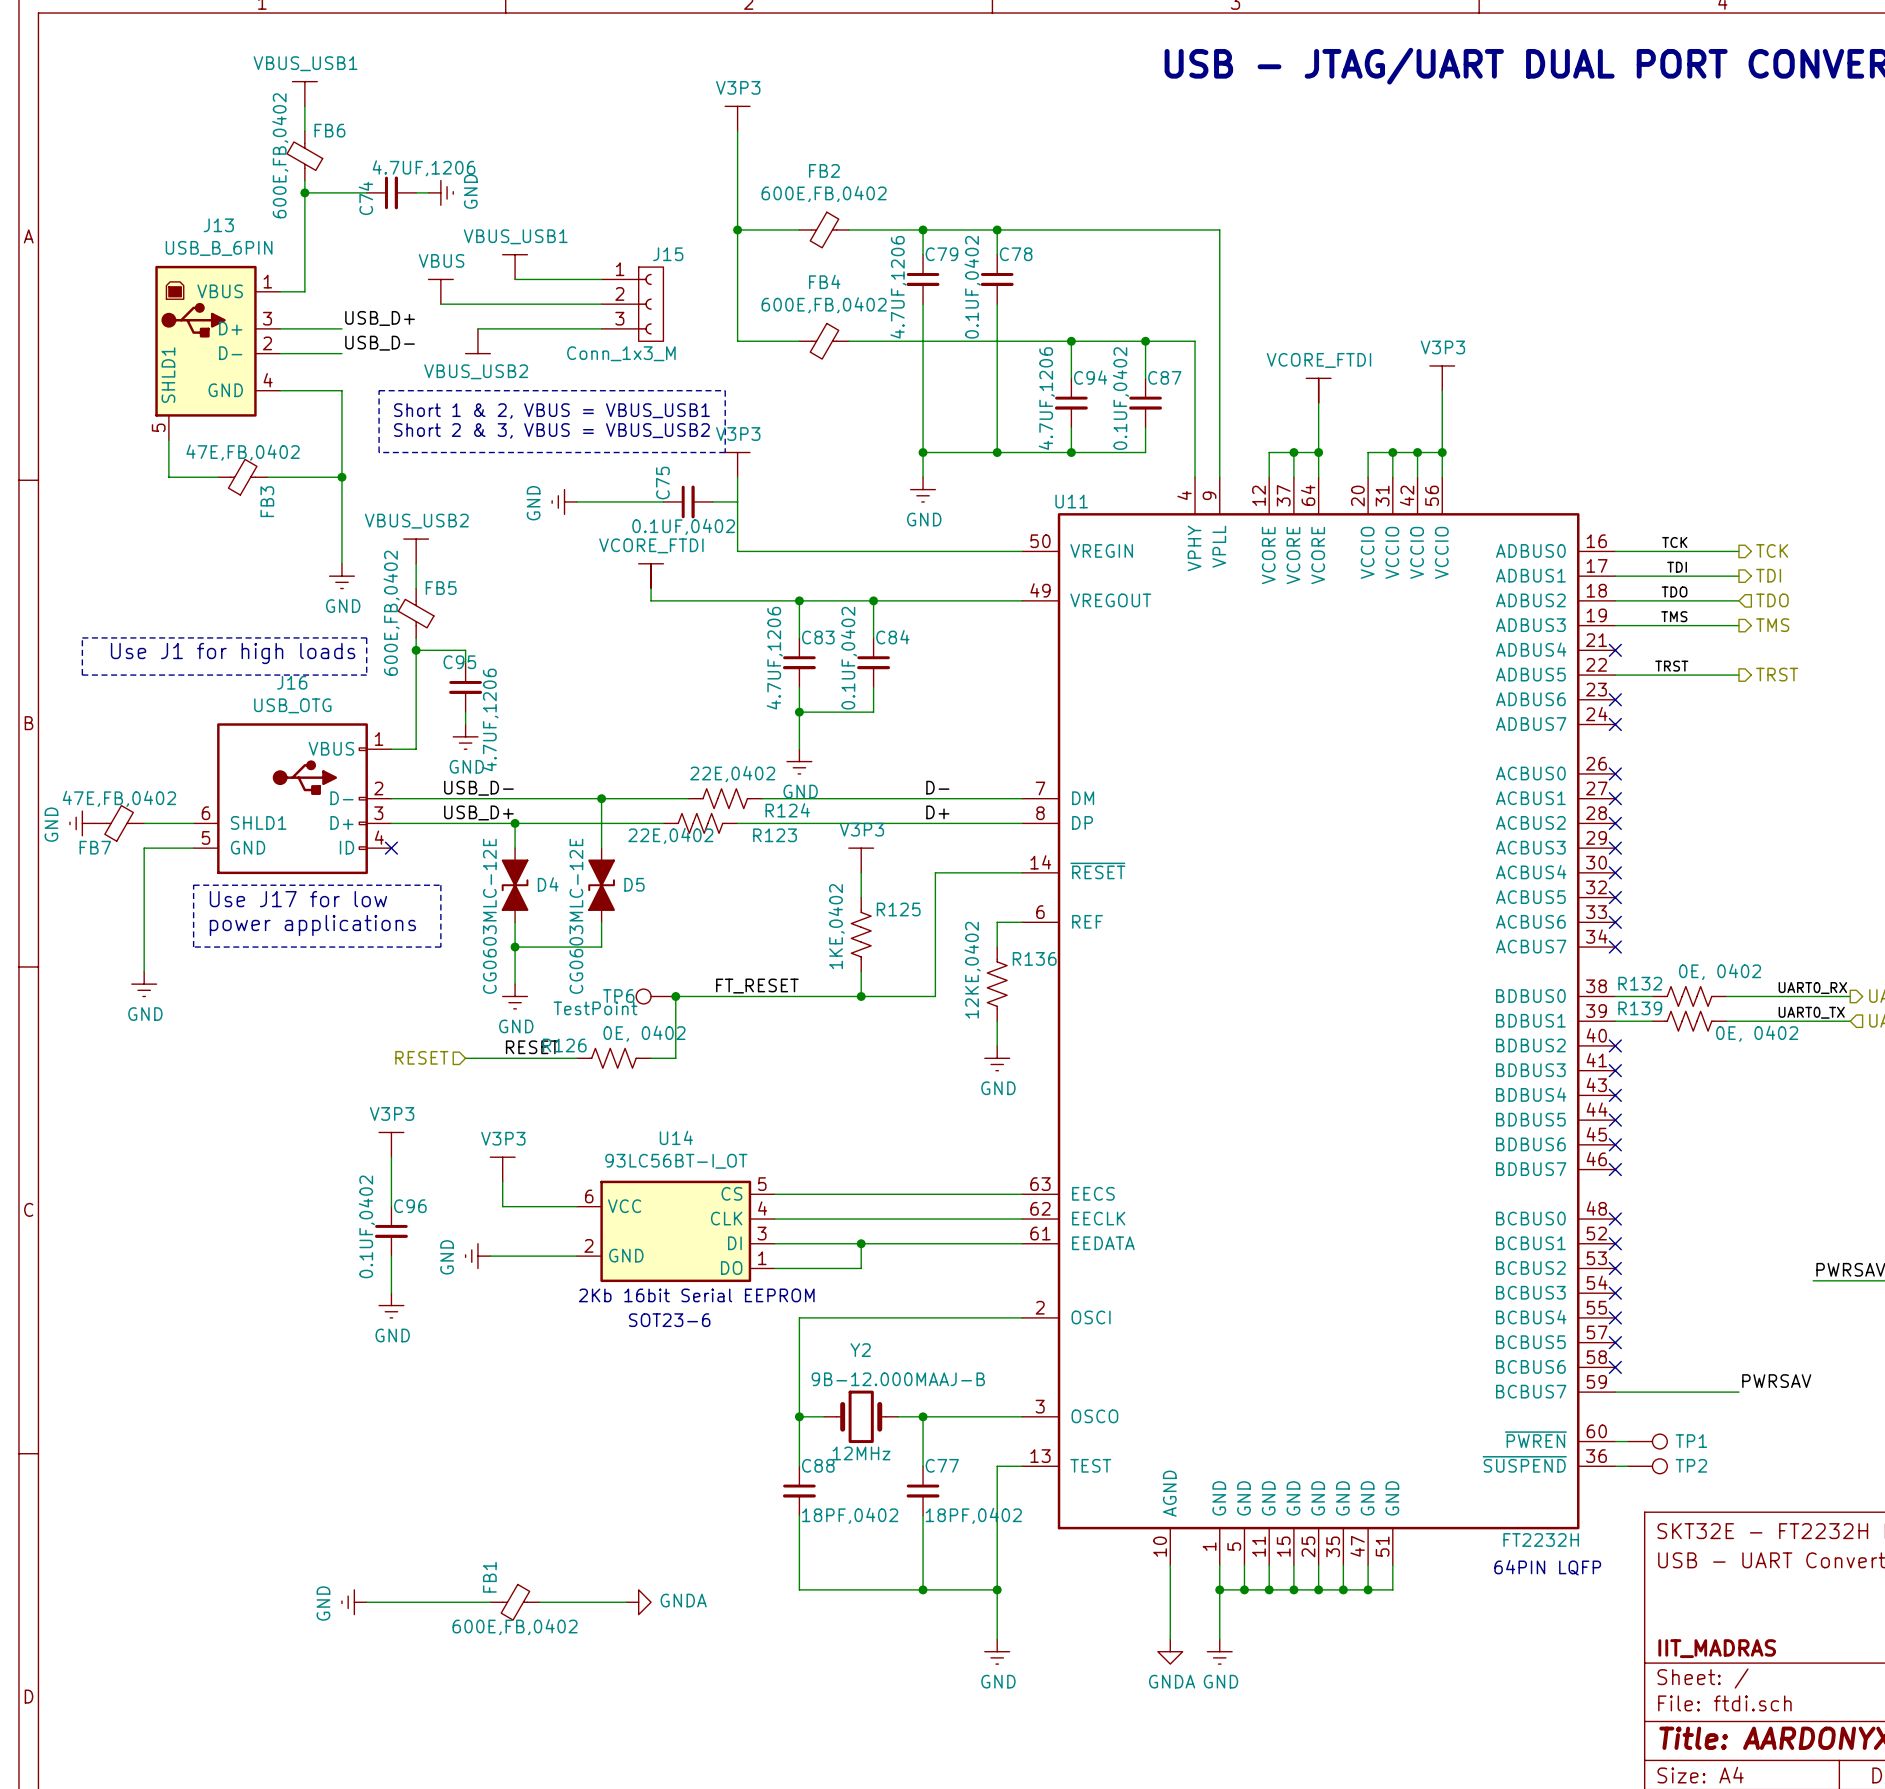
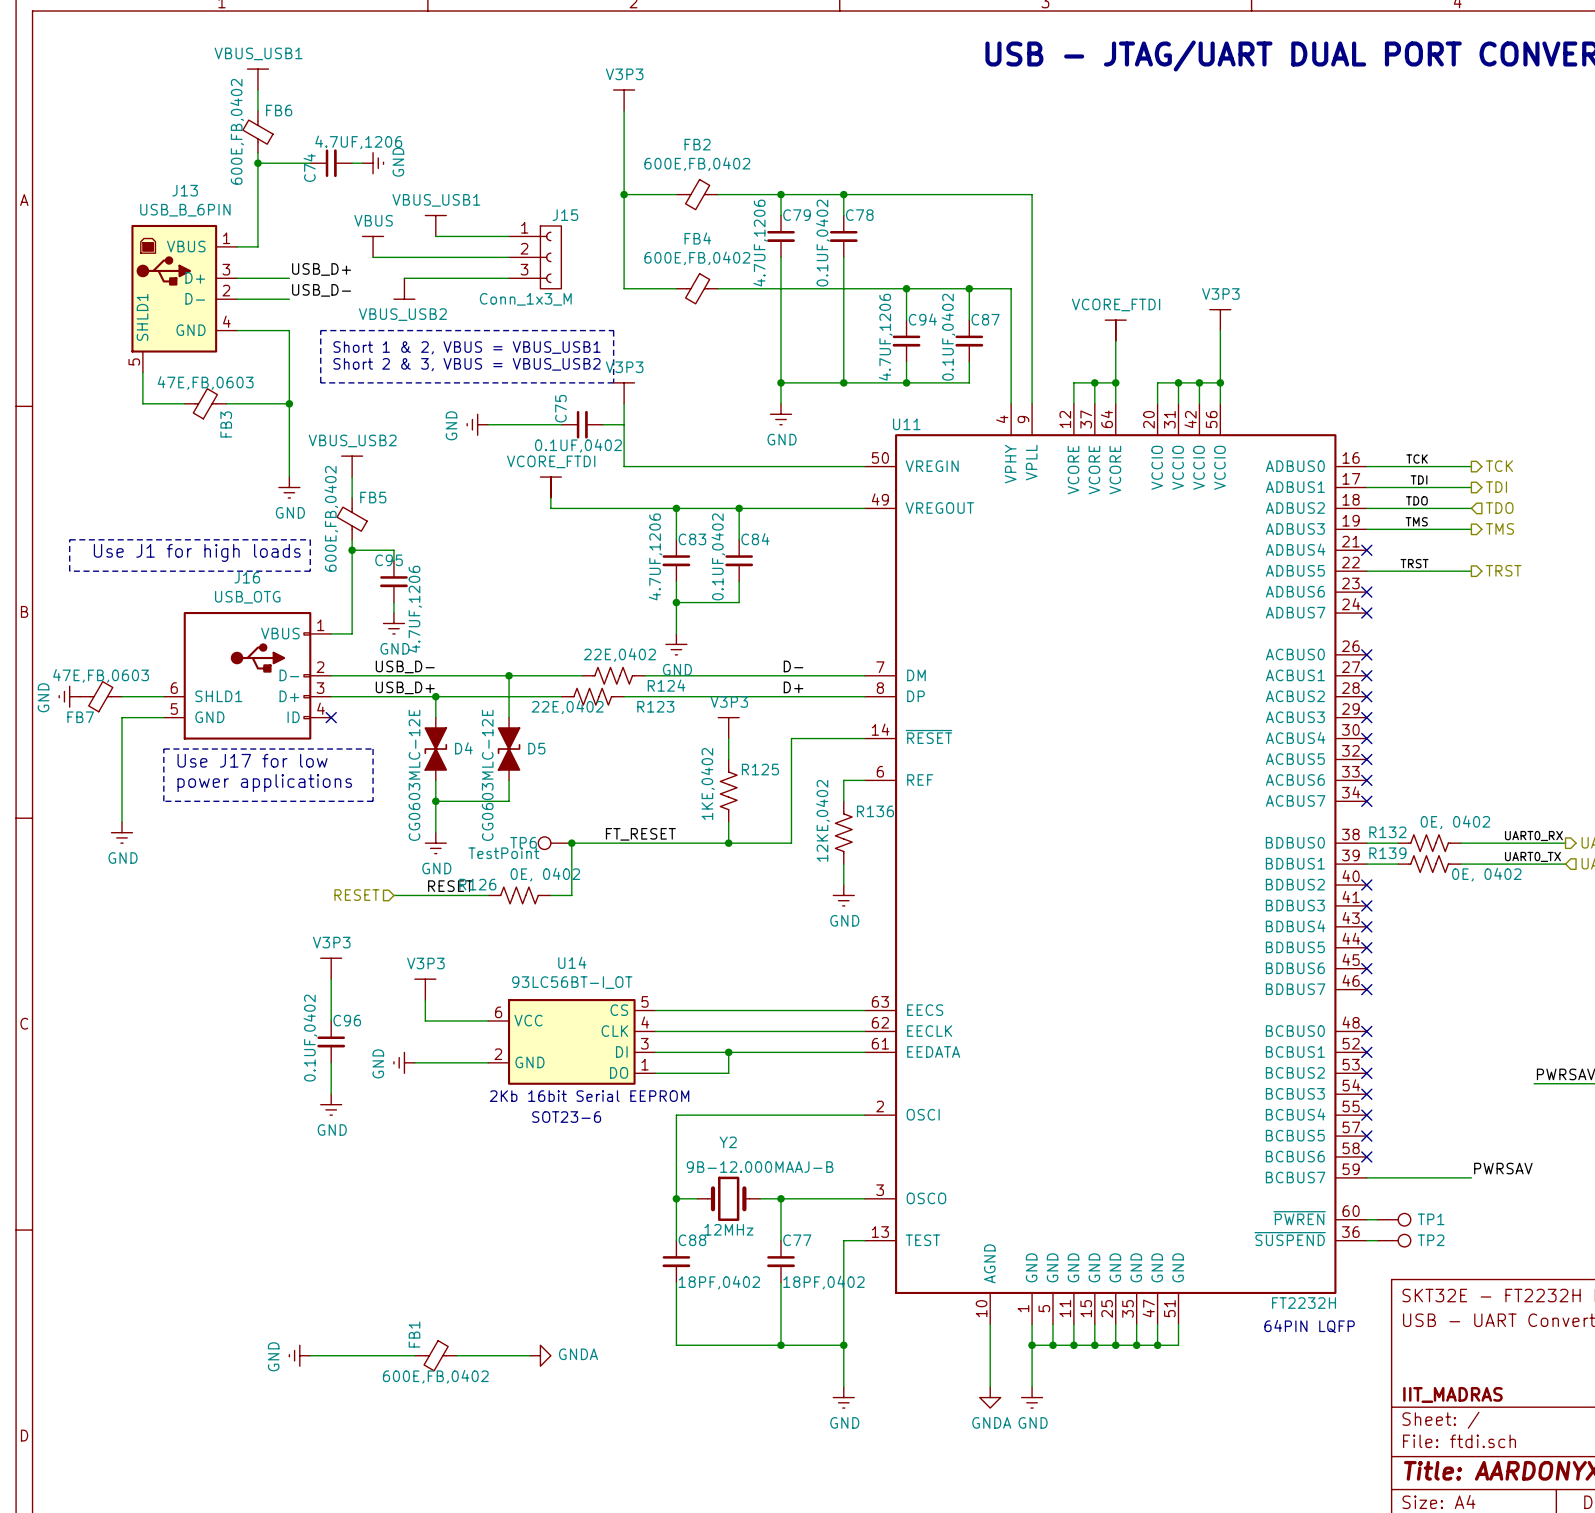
FB3 value: 47E,FB,0402 (243, 452) -> 47E,FB,0603 (205, 383)
FB7 value: 47E,FB,0402 (119, 798) -> 47E,FB,0603 (101, 675)

